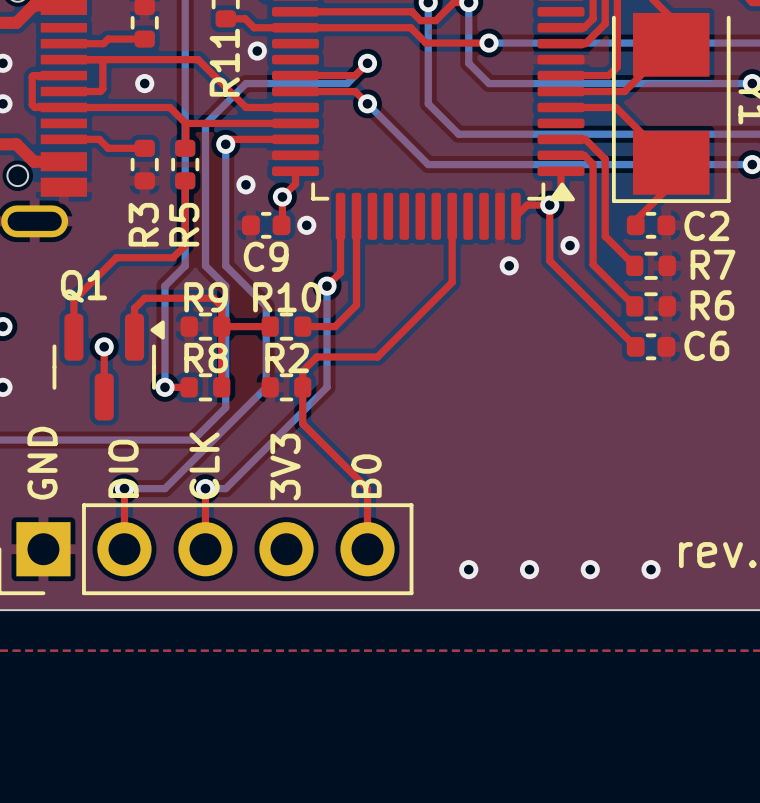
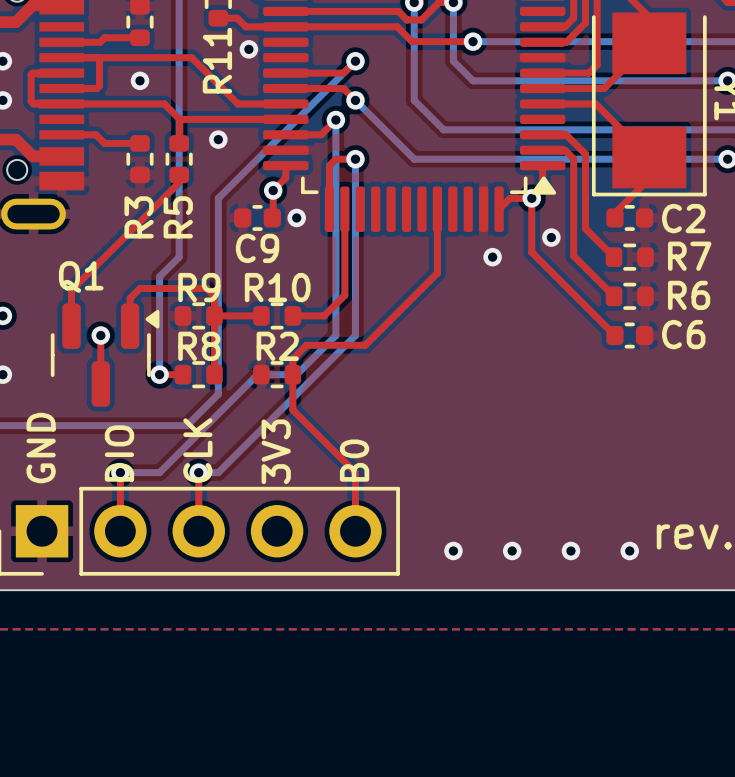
bottom track: (347, 83) (245, 83) (205, 124) (205, 265) (225, 286) -> (335, 80) (218, 198)
bottom track: none -> (335, 120) (335, 335) (296, 374) (257, 374)
via: none -> (335, 120)
top track: (295, 139) (230, 139) (225, 144) -> (285, 134) (321, 134) (335, 120)
bottom track: (225, 144) (225, 205) -> none
via: none -> (355, 159)
via: (245, 184) -> none
top track: (185, 188) (185, 245) (173, 257) (116, 257) -> (179, 182) (112, 249)
top track: (340, 216) (340, 272) (326, 286) -> (329, 209) (329, 165) (335, 159) (355, 159)
bottom track: (225, 265) (266, 306) (266, 387) -> (218, 257) (218, 276)
bottom track: (326, 286) (326, 387) -> (355, 159) (355, 335) (316, 374)
via: (326, 286) -> none

